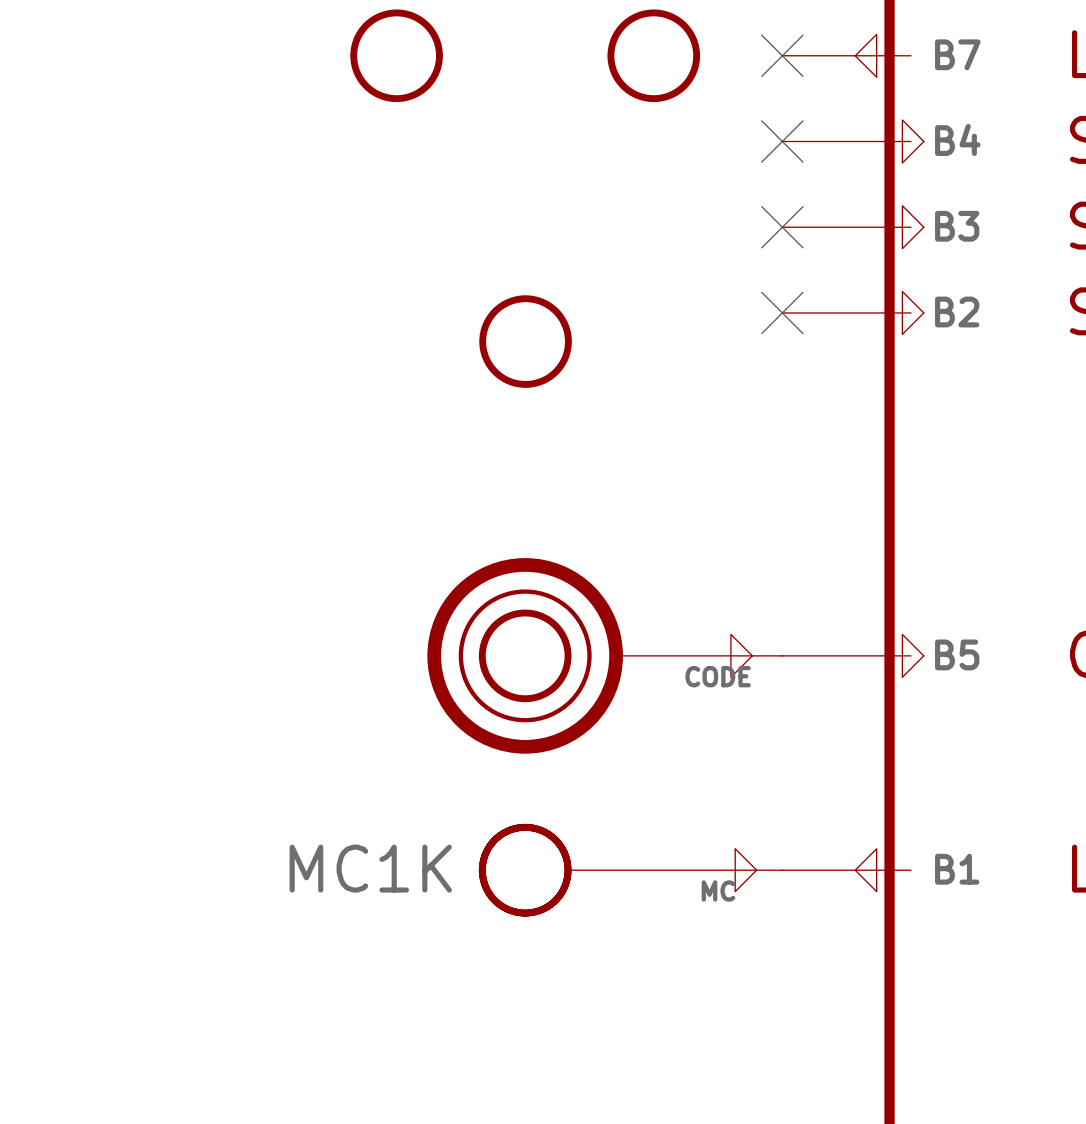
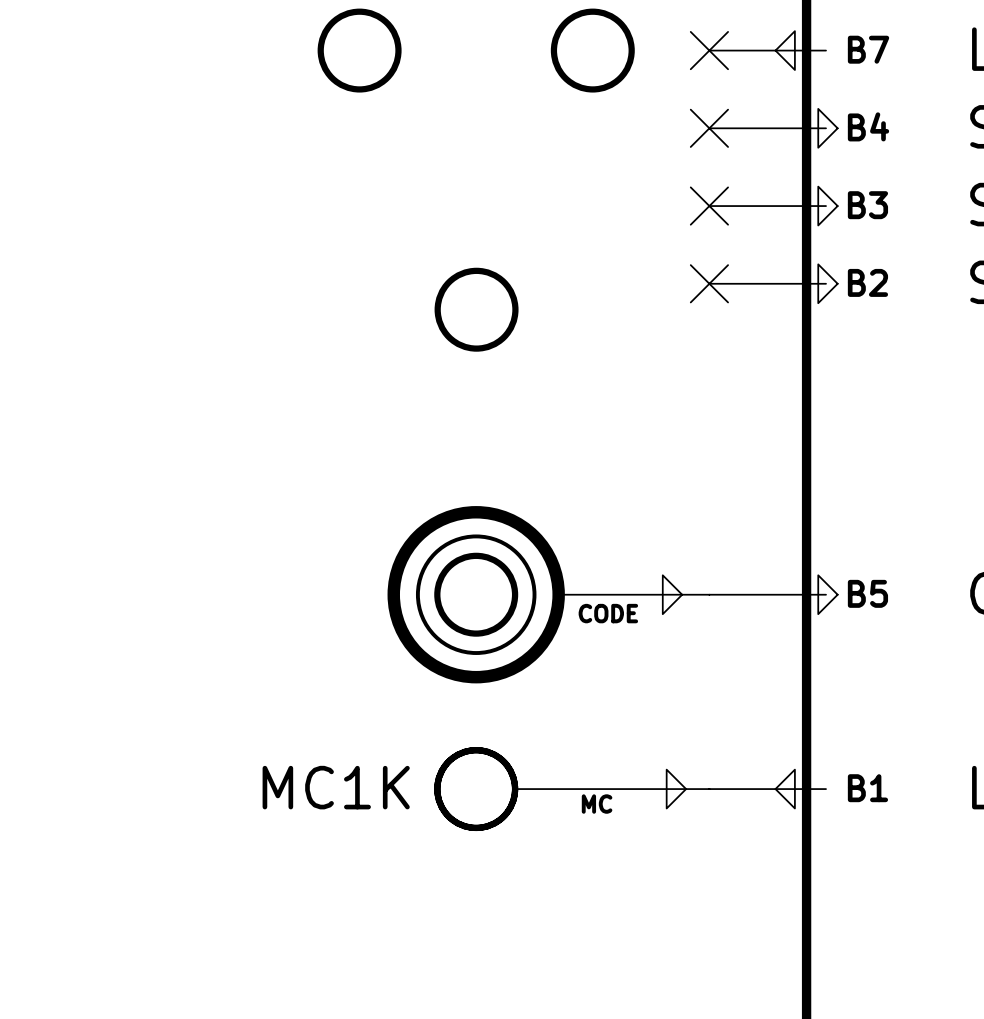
part value position: CODE (718, 676) -> CODE (608, 613)
part value position: MC (718, 890) -> MC (597, 804)

